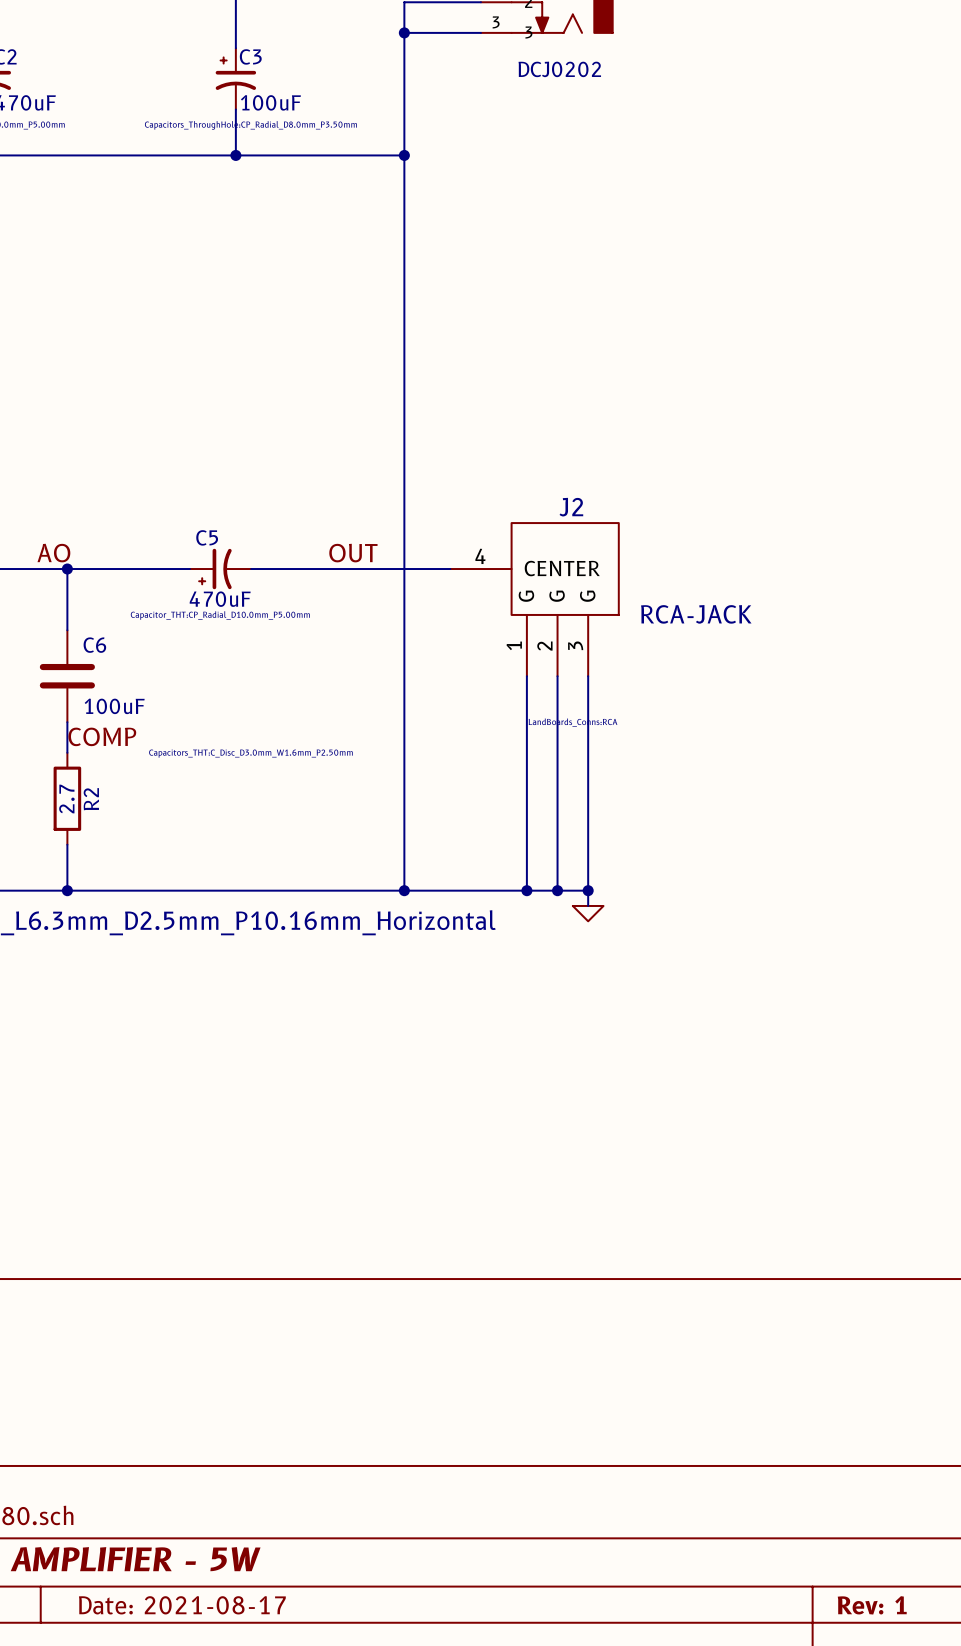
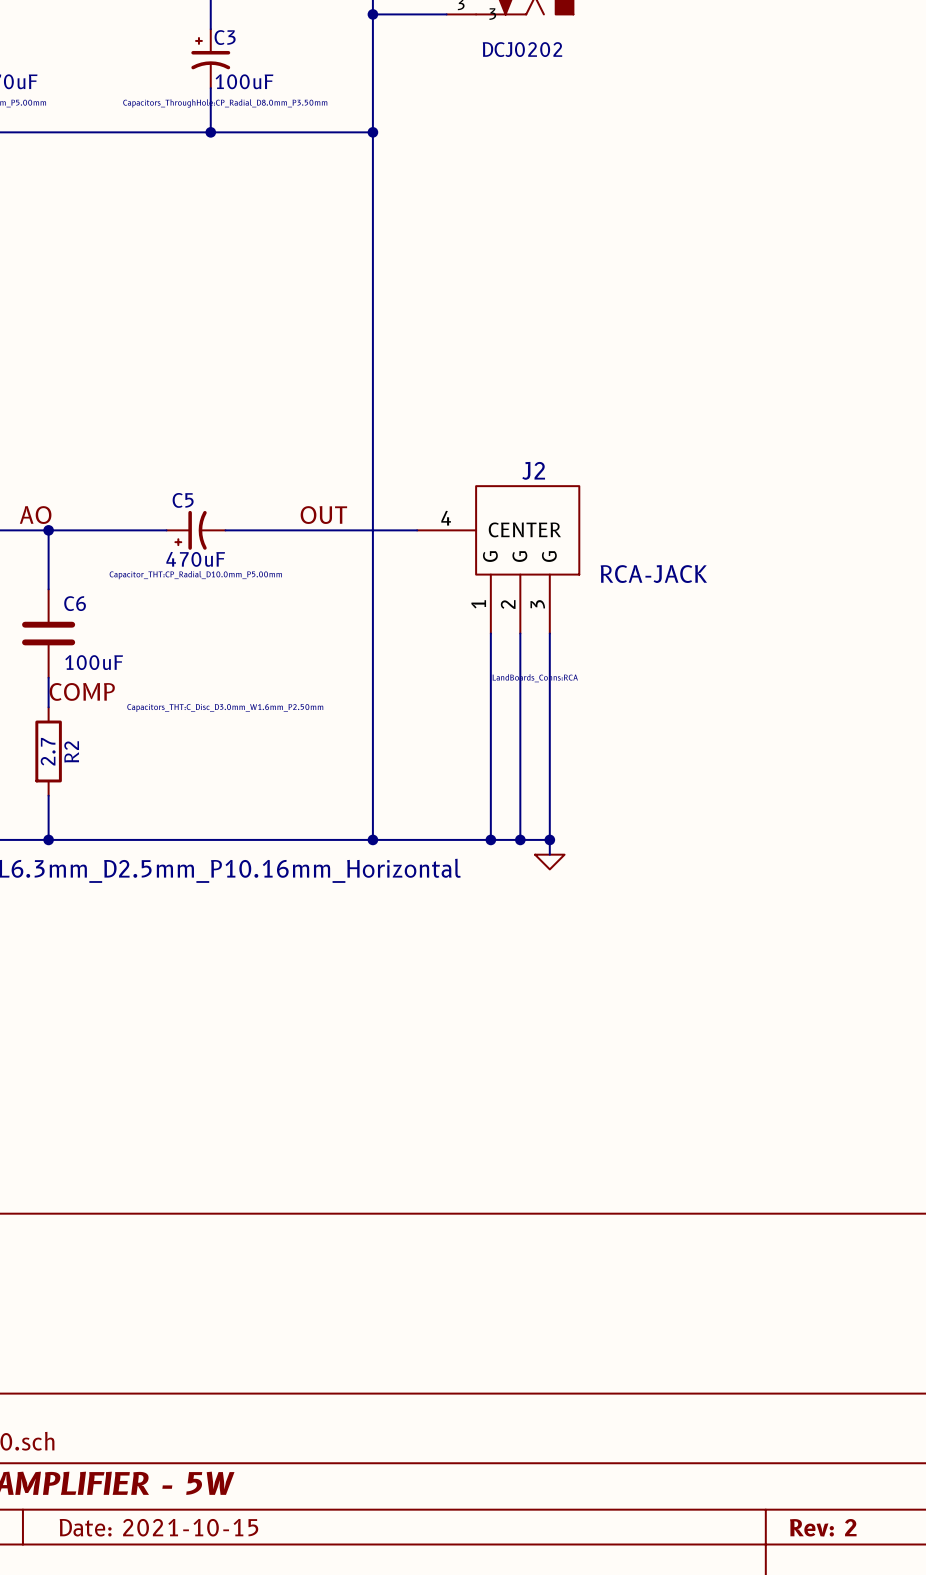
title block: Date: 2021-08-17 (182, 1605) -> Date: 2021-10-15 (158, 1527)
title block: Rev: 1 (872, 1605) -> Rev: 2 (823, 1527)

